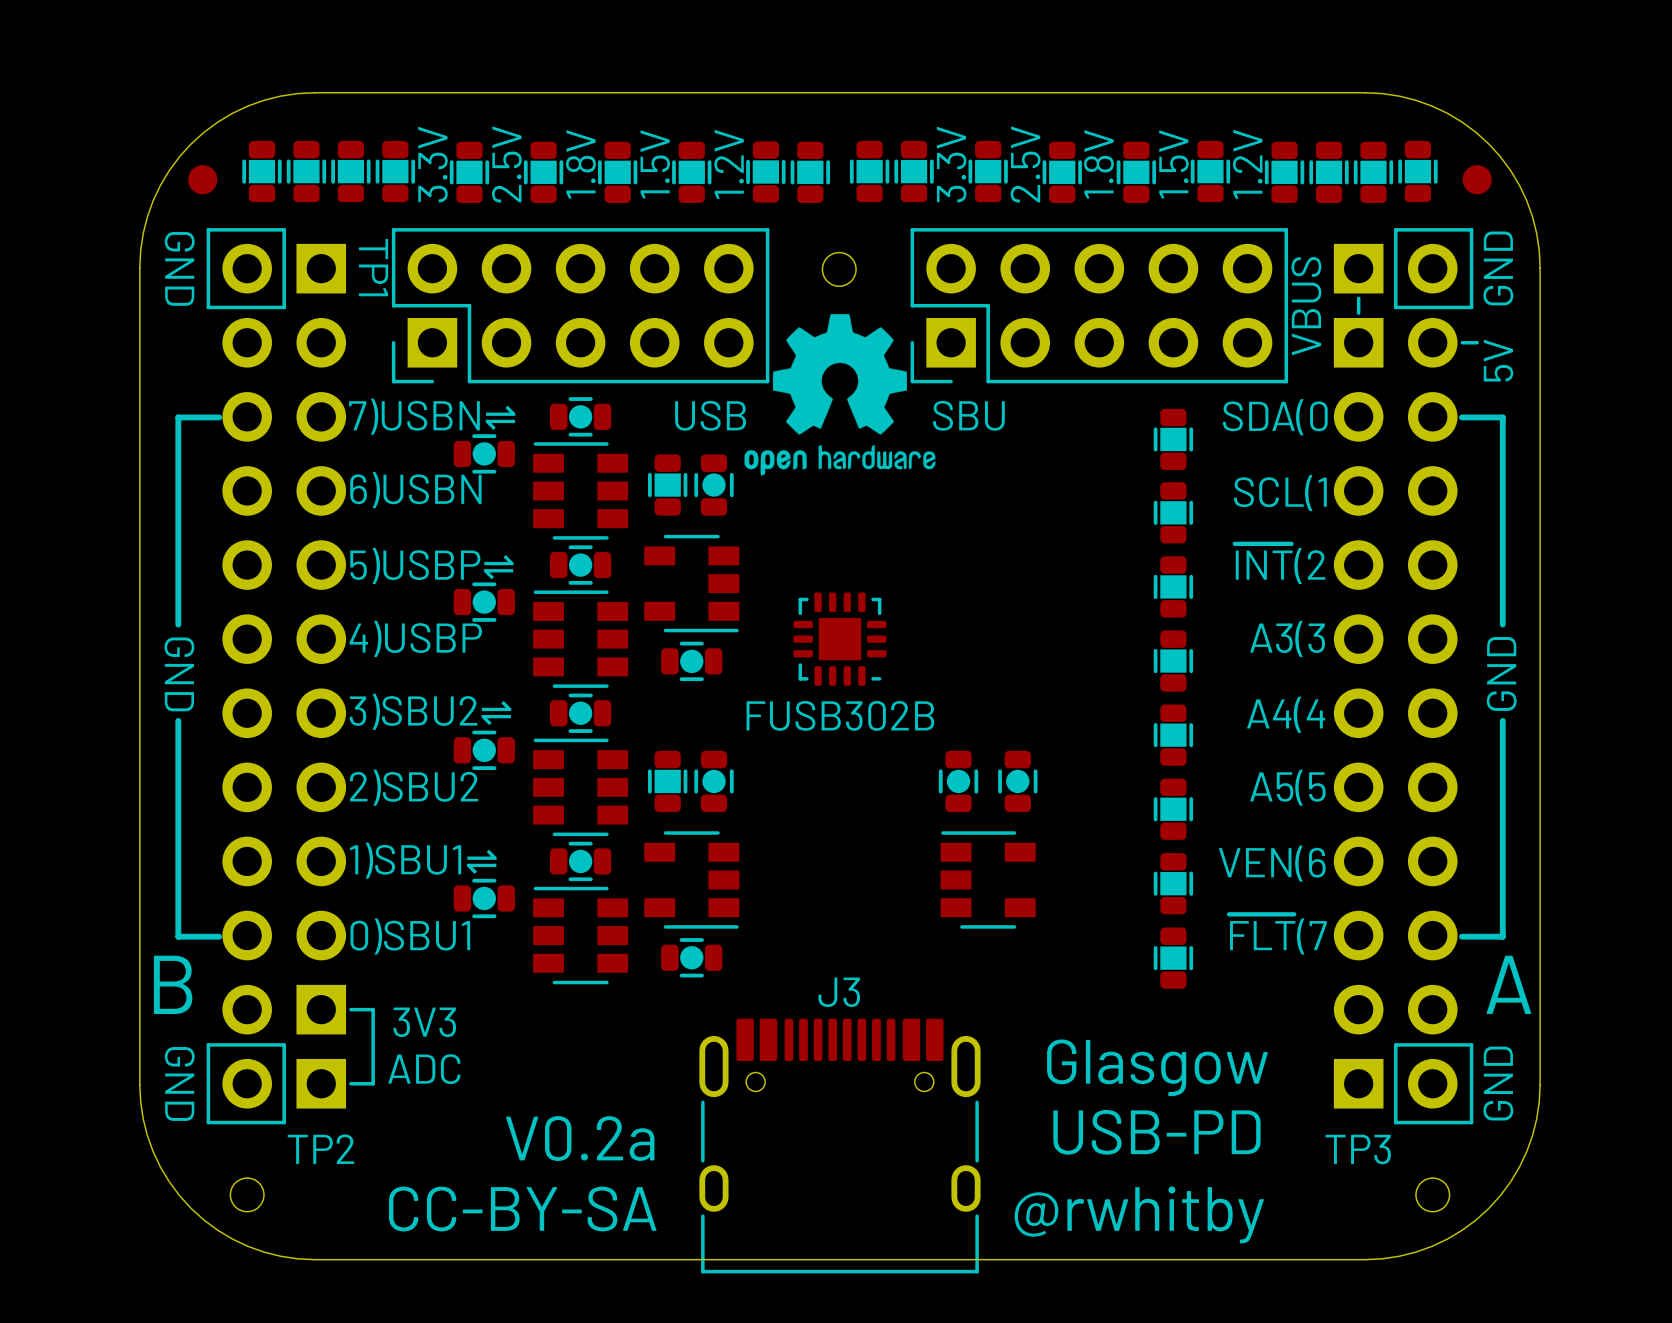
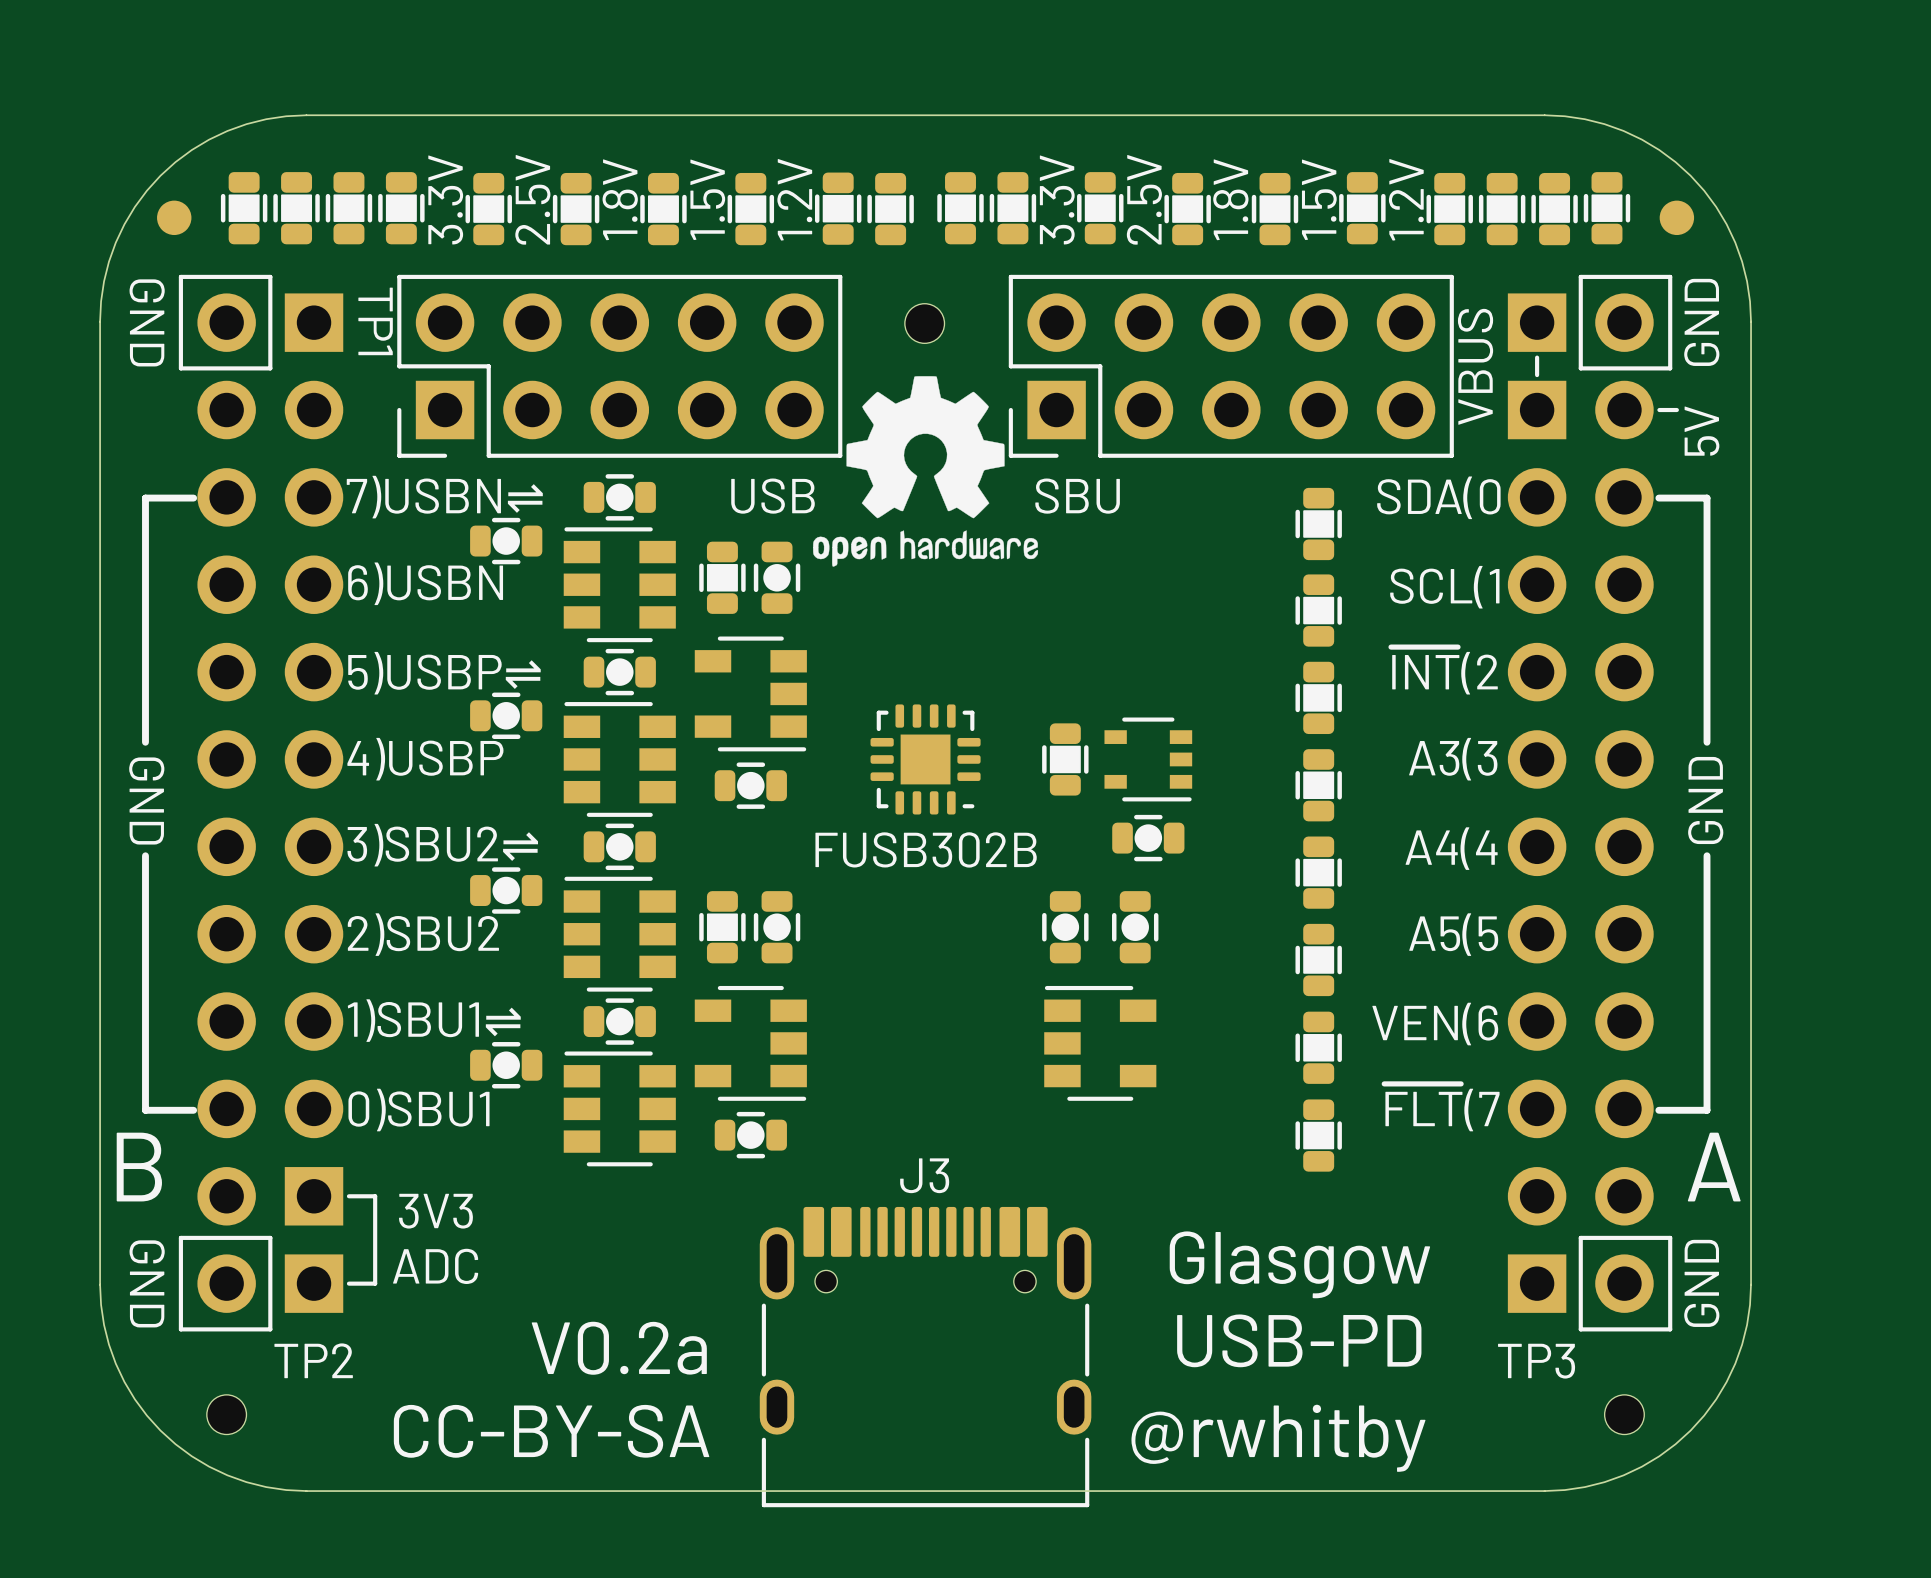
part: none -> (1065, 759)
part: none -> (1148, 759)
part: none -> (1148, 838)

